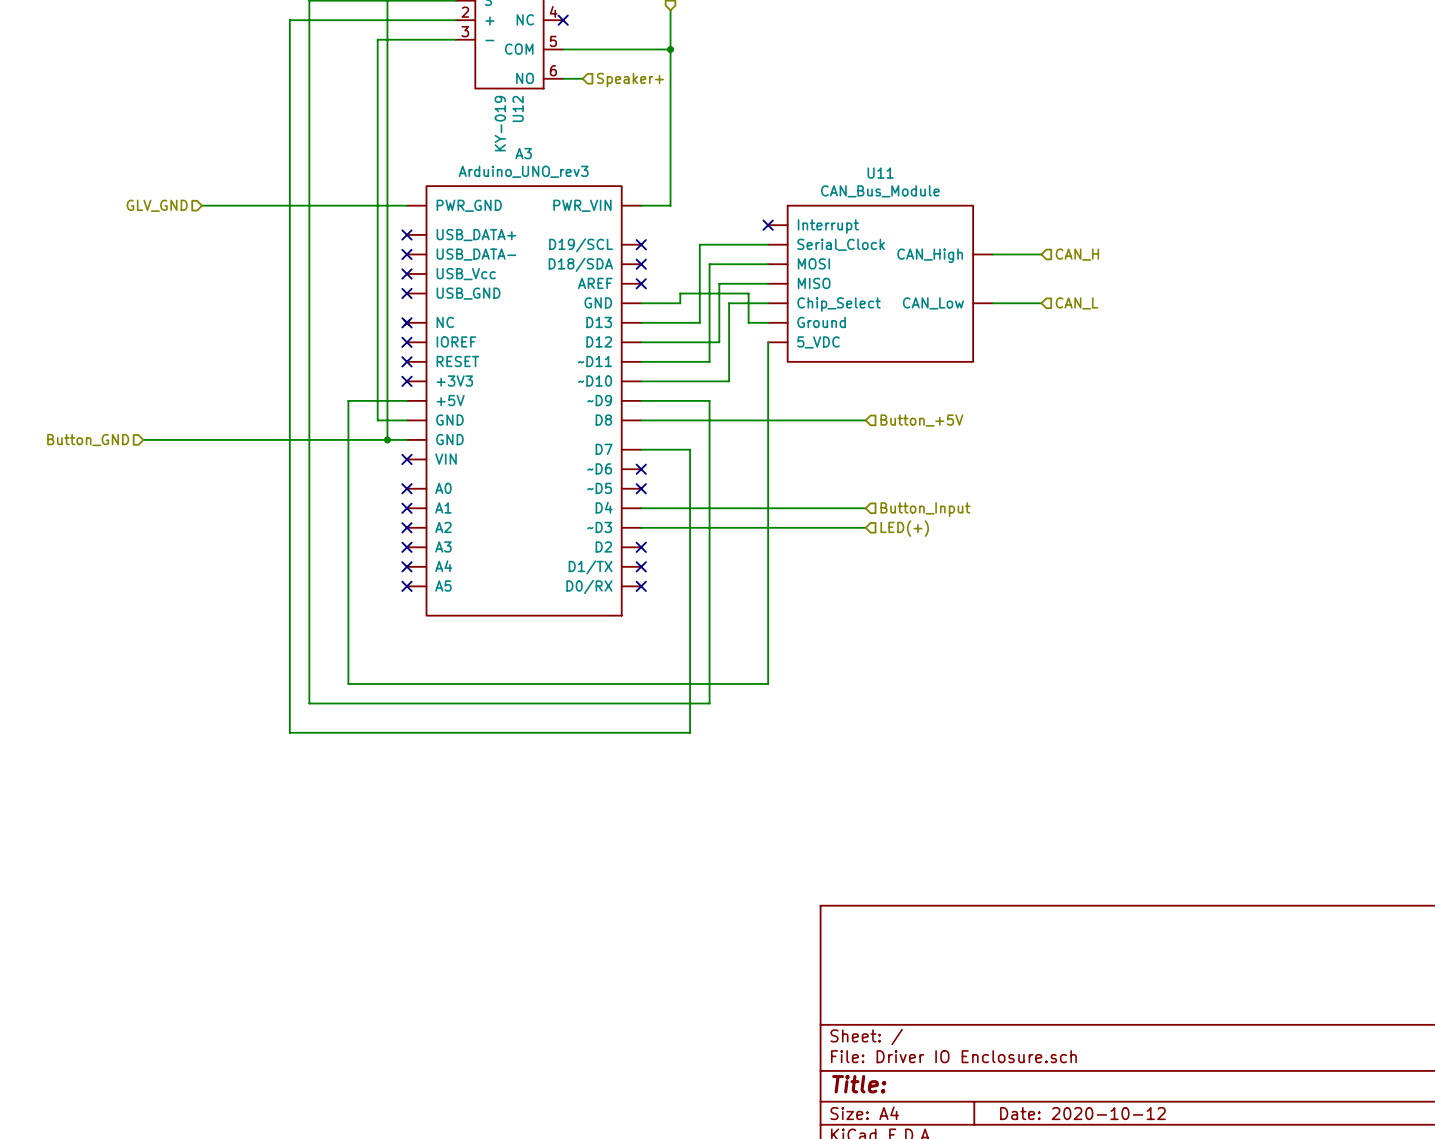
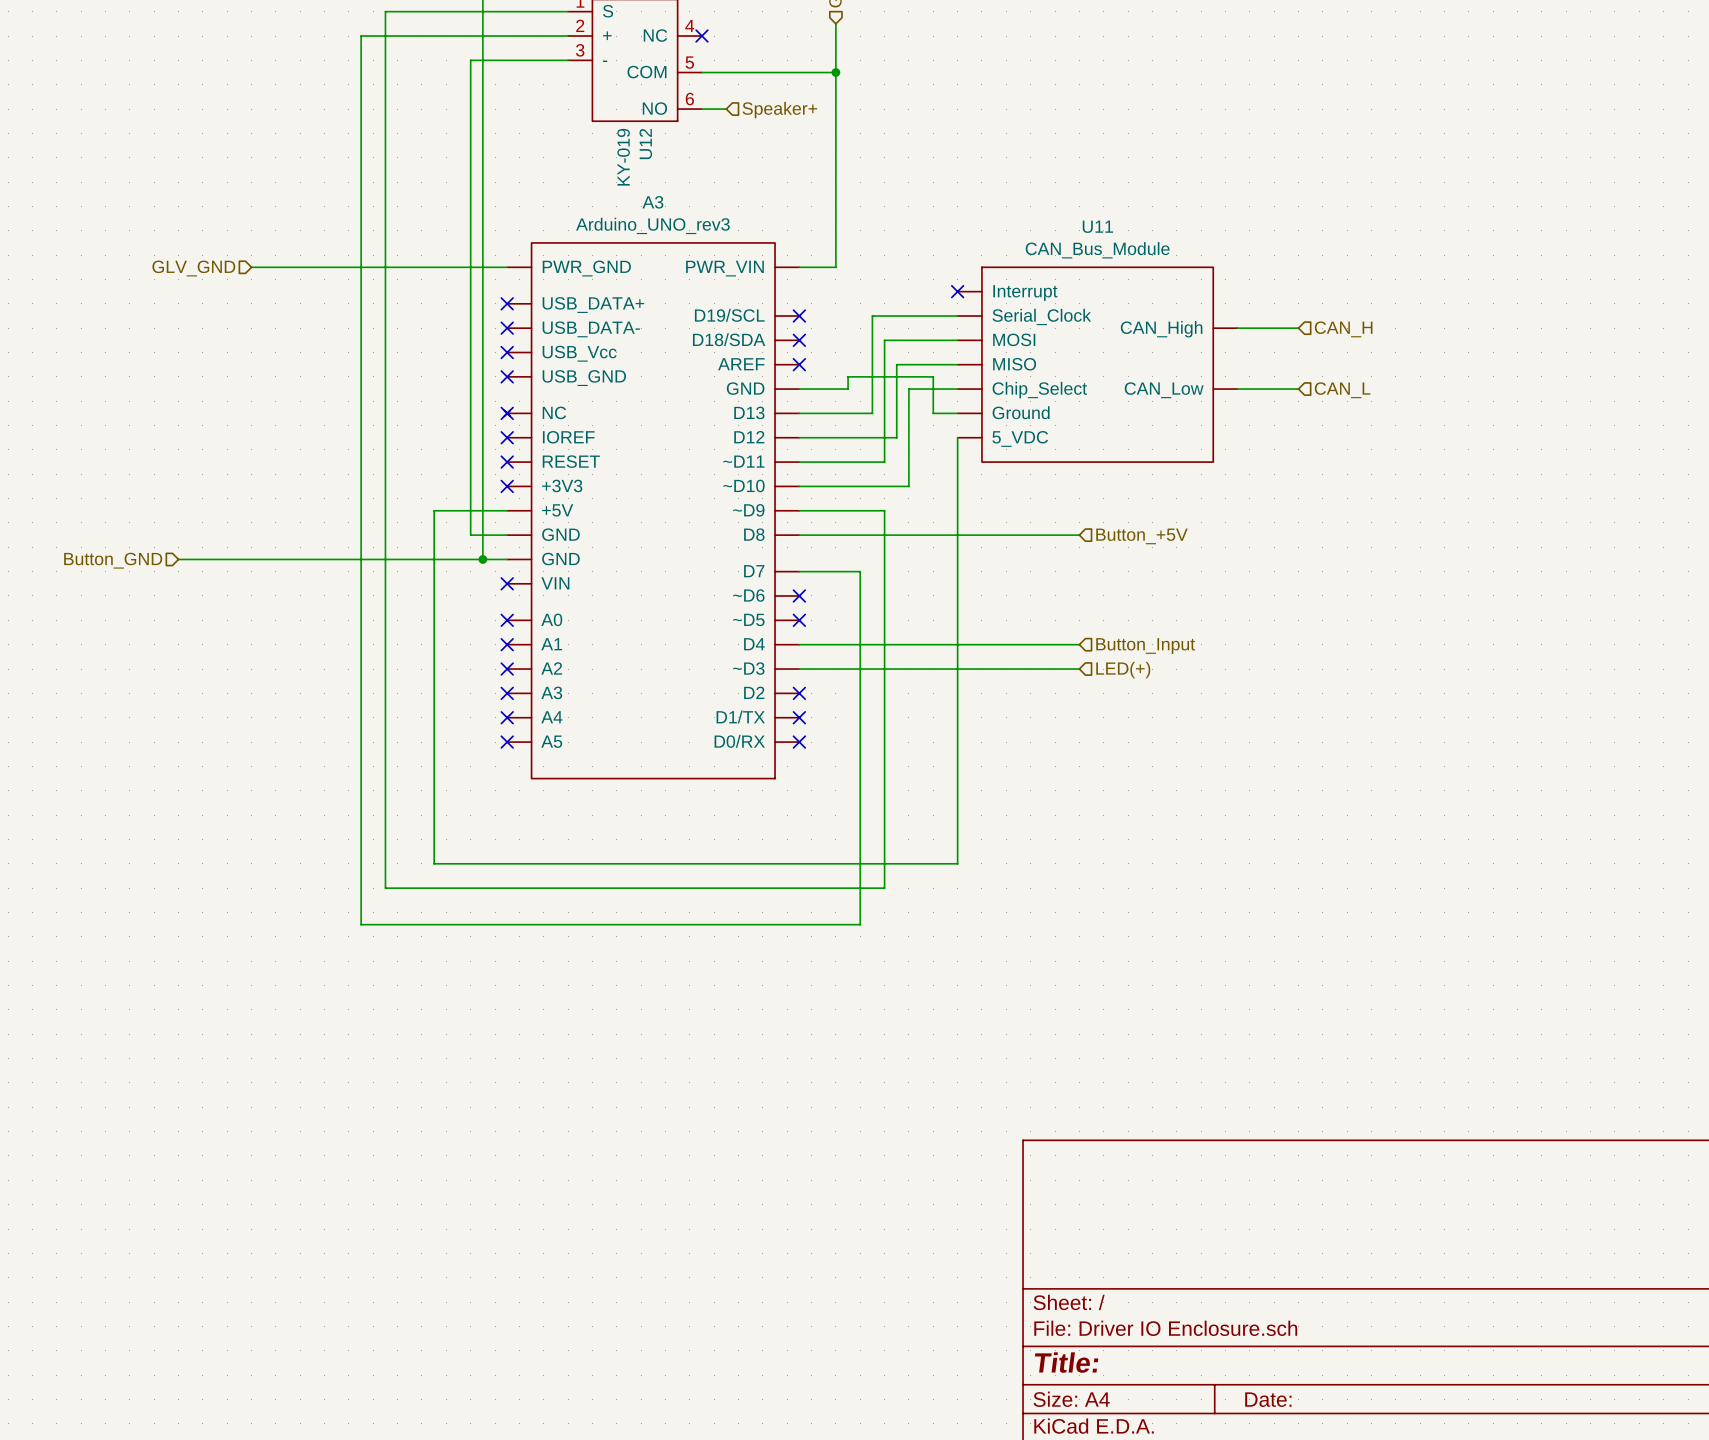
title block: Date: 2020-10-12 (1082, 1113) -> Date: (1268, 1399)

